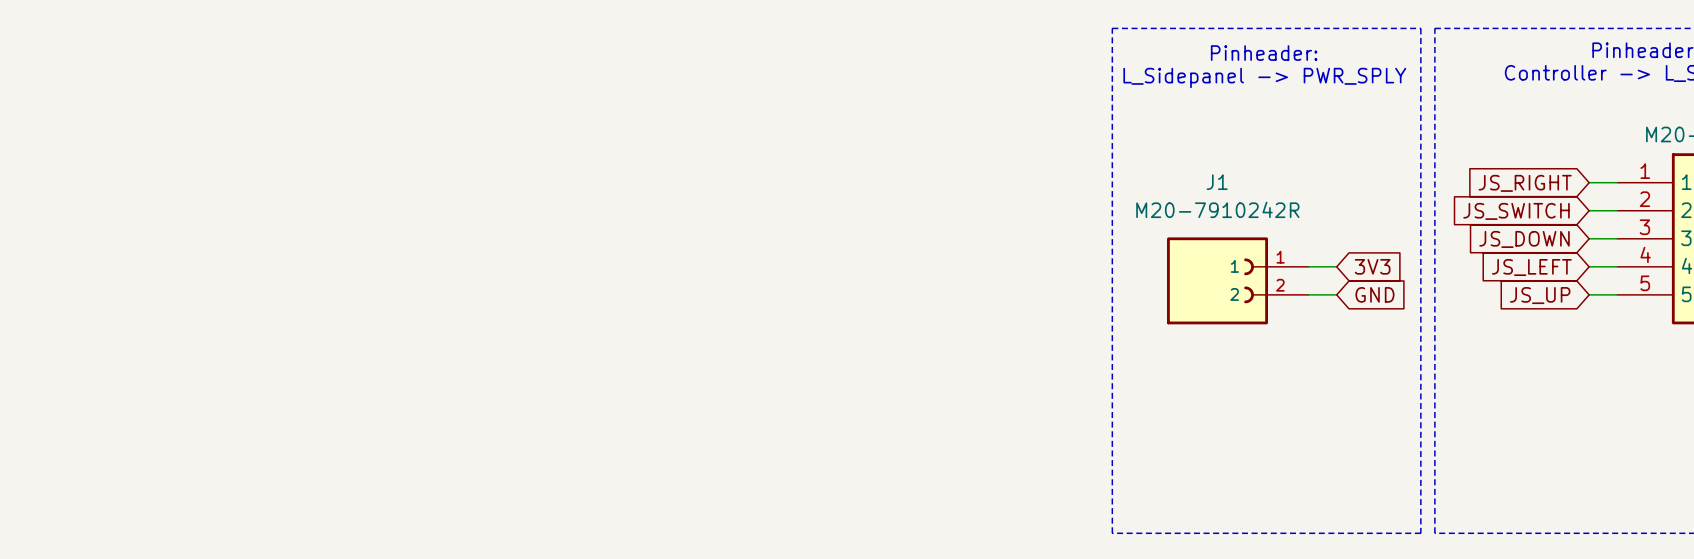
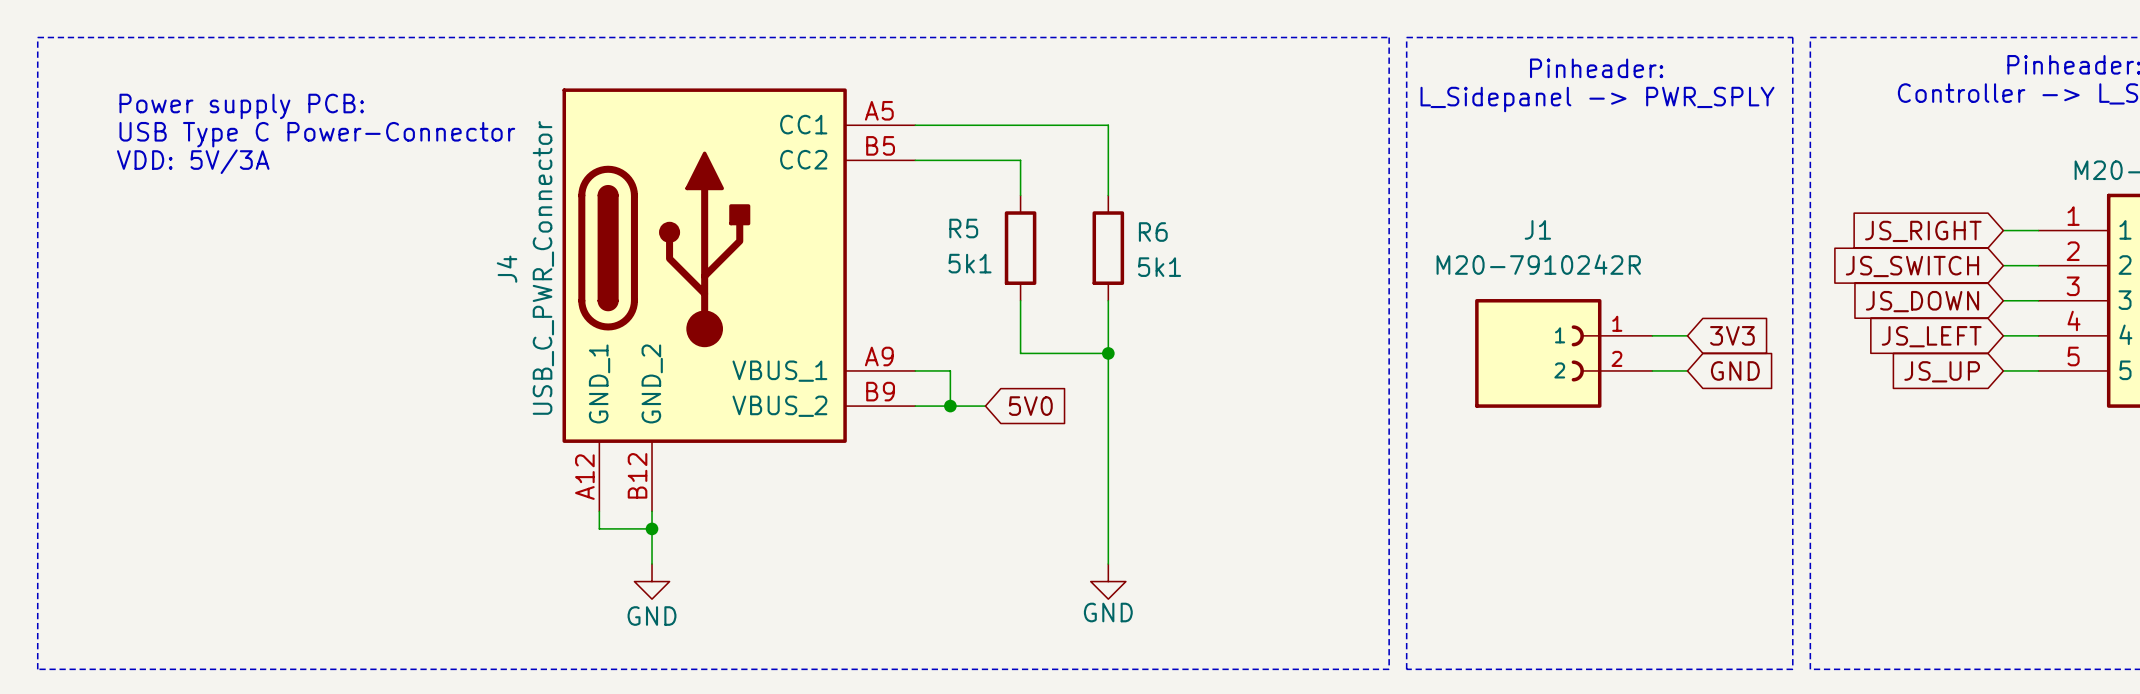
line: none -> (37, 37) (1389, 37) (1389, 669) (37, 669) (37, 37)
text: none -> Power supply PCB: (241, 106)
wire: none -> (915, 125) (1108, 125) (1108, 195)
text: none -> USB Type C Power-Connector (317, 134)
wire: none -> (915, 160) (1020, 160) (1020, 195)
text: none -> VDD: 5V/3A (193, 161)
R5: none -> 5k1 (1020, 248)
R6: none -> 5k1 (1108, 248)
J4: none -> USB_C_PWR_Connector (738, 299)
wire: none -> (1020, 300) (1020, 353) (1108, 353)
wire: none -> (1108, 300) (1108, 564)
junction: none -> (1108, 353)
wire: none -> (915, 370) (950, 370) (950, 406)
wire: none -> (915, 406) (985, 406)
junction: none -> (950, 406)
global label: none -> 5V0 (1030, 406)
wire: none -> (599, 511) (599, 528) (652, 528)
wire: none -> (652, 511) (652, 564)
junction: none -> (652, 528)
power symbol: none -> GND (652, 581)
power symbol: none -> GND (1108, 581)

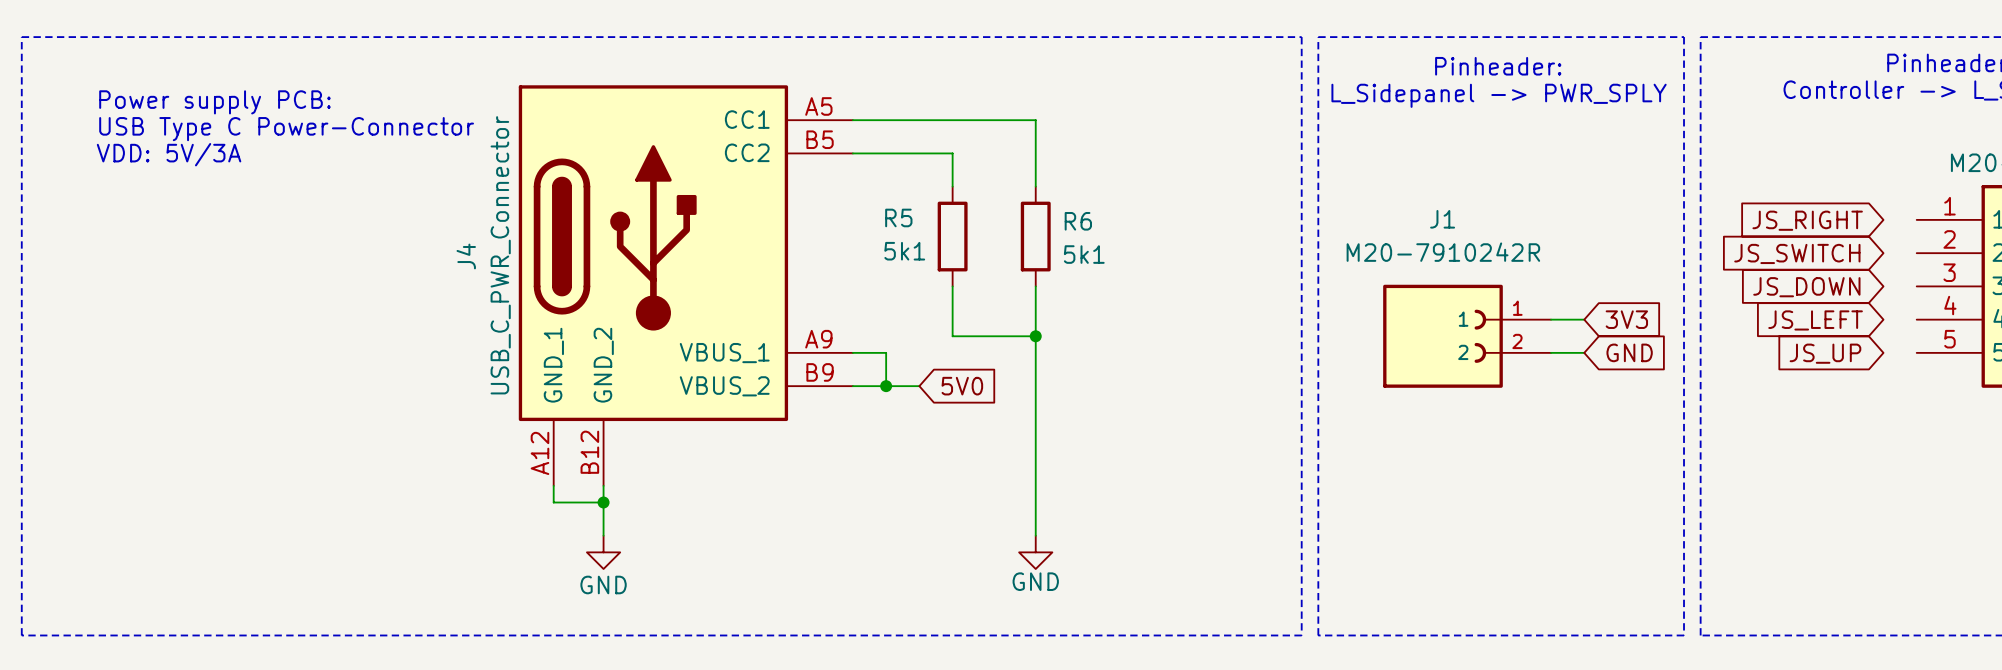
wire: (2003, 230) (2038, 230) -> none
wire: (2003, 265) (2038, 265) -> none
wire: (2003, 300) (2038, 300) -> none
wire: (2003, 335) (2038, 335) -> none
wire: (2003, 370) (2038, 370) -> none

